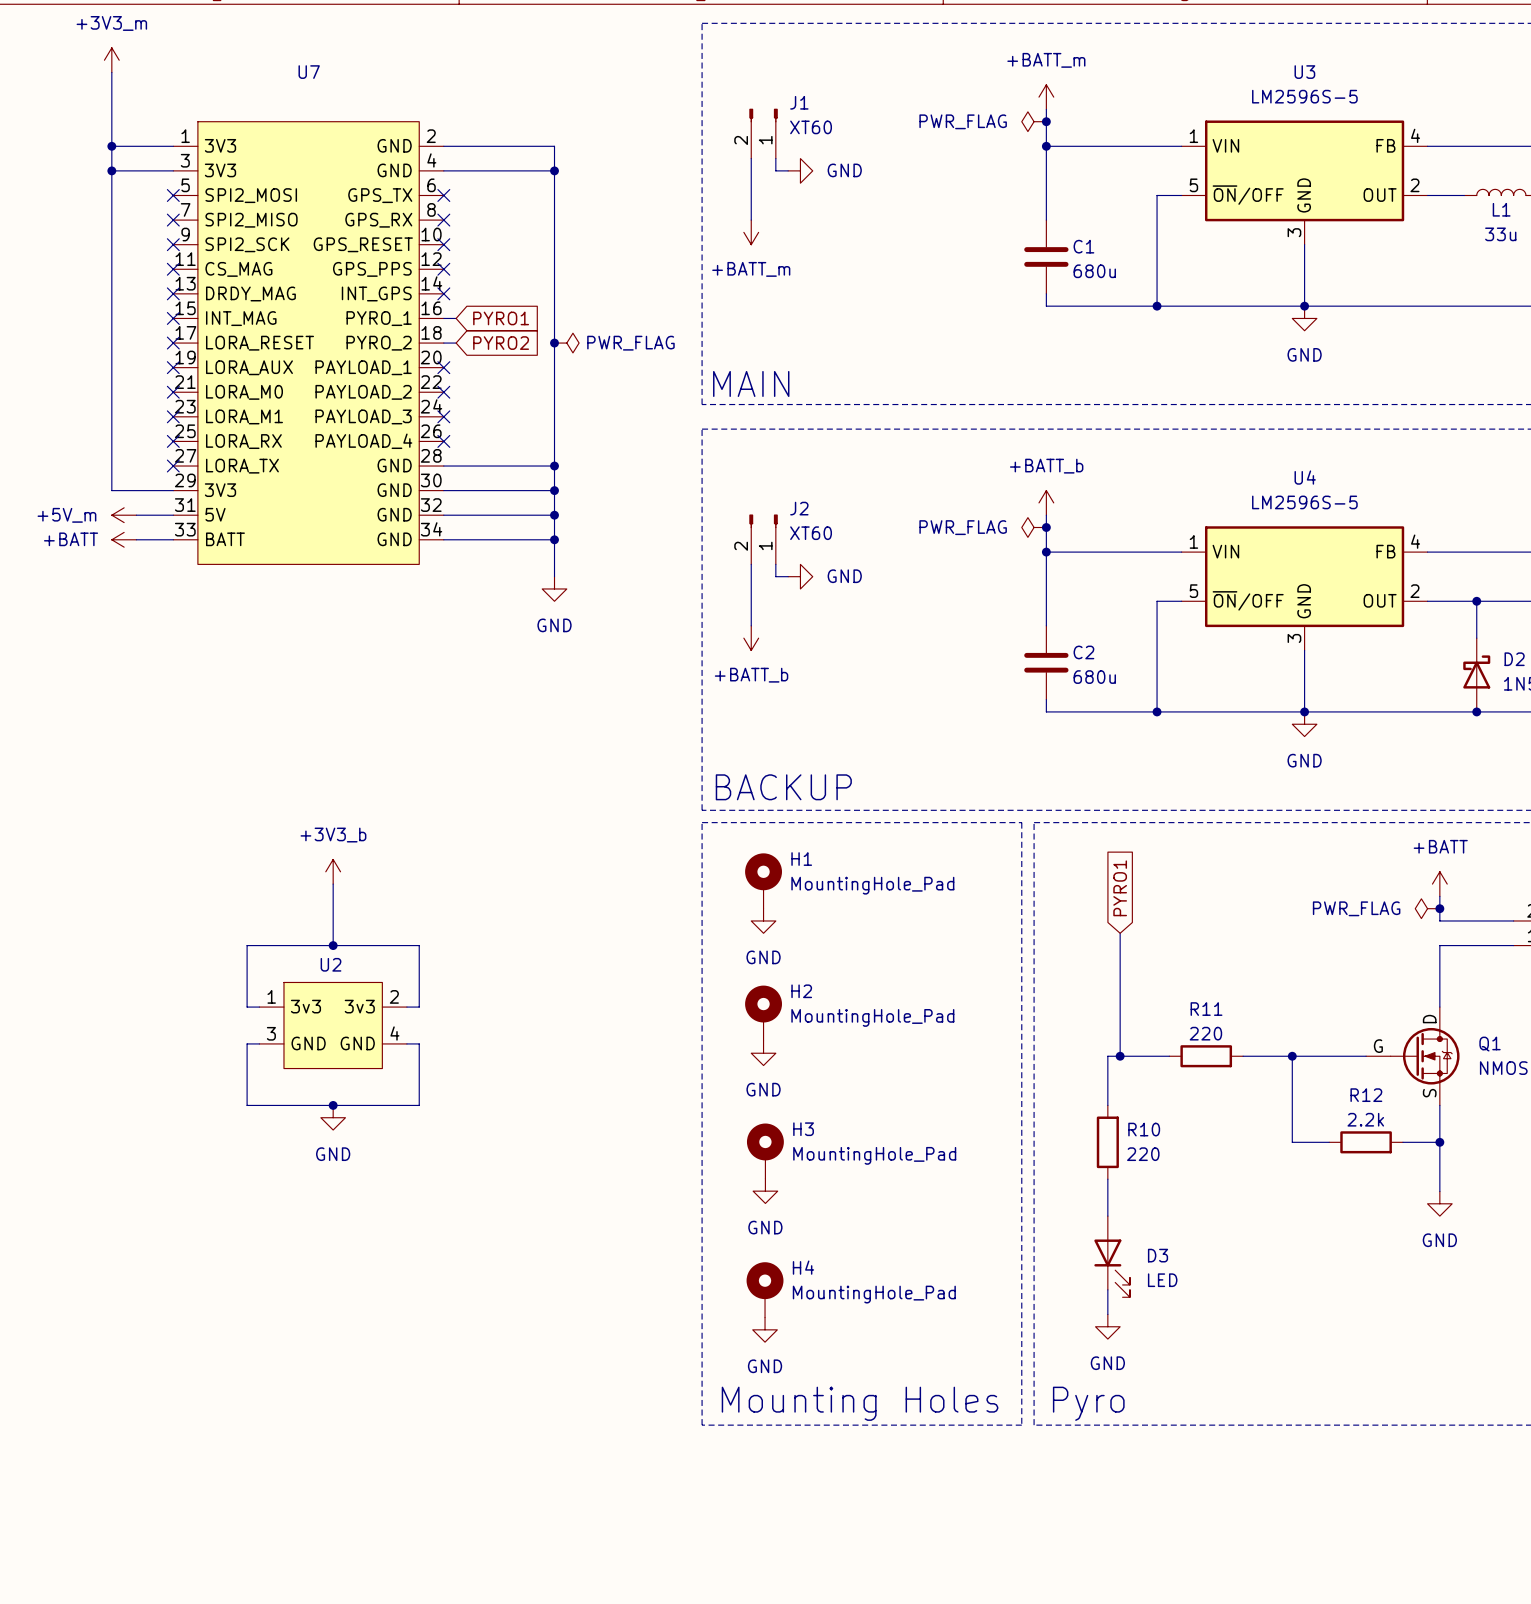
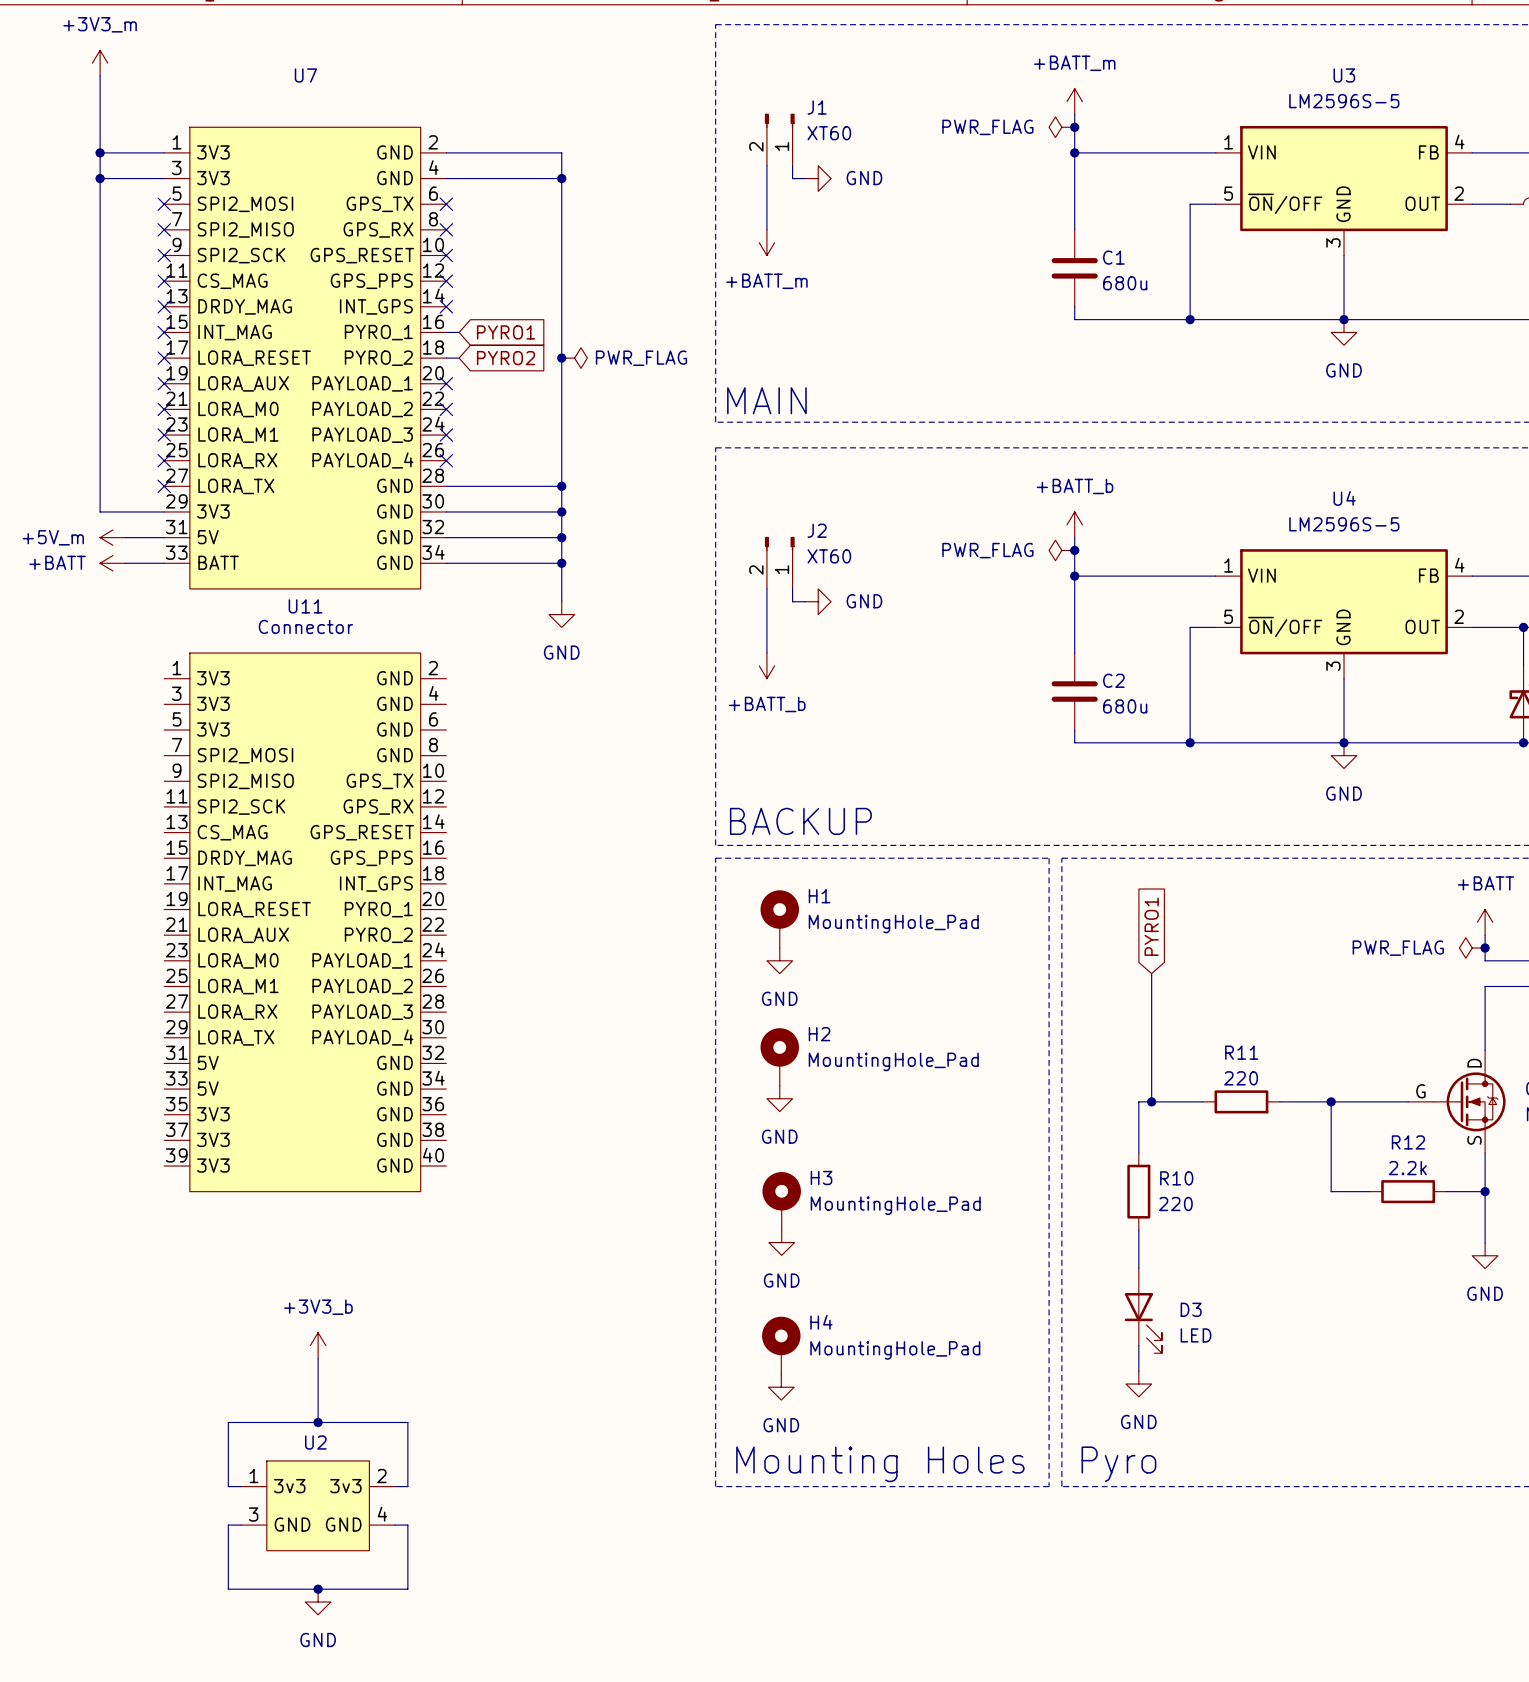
power symbol: +3V3_b (333, 871) -> none
U11: none -> Connector (305, 922)
junction: (333, 945) -> none
U2 position: (333, 1025) -> (318, 1505)
junction: (333, 1105) -> none
power symbol: GND (333, 1117) -> none
power symbol: none -> +3V3_b (318, 1345)
wire: none -> (318, 1358) (318, 1422)
junction: none -> (318, 1422)
wire: none -> (241, 1486) (228, 1486) (228, 1422) (407, 1422) (407, 1486) (395, 1486)
wire: none -> (241, 1525) (228, 1525) (228, 1589) (407, 1589) (407, 1525) (395, 1525)
junction: none -> (318, 1589)
power symbol: none -> GND (318, 1602)

